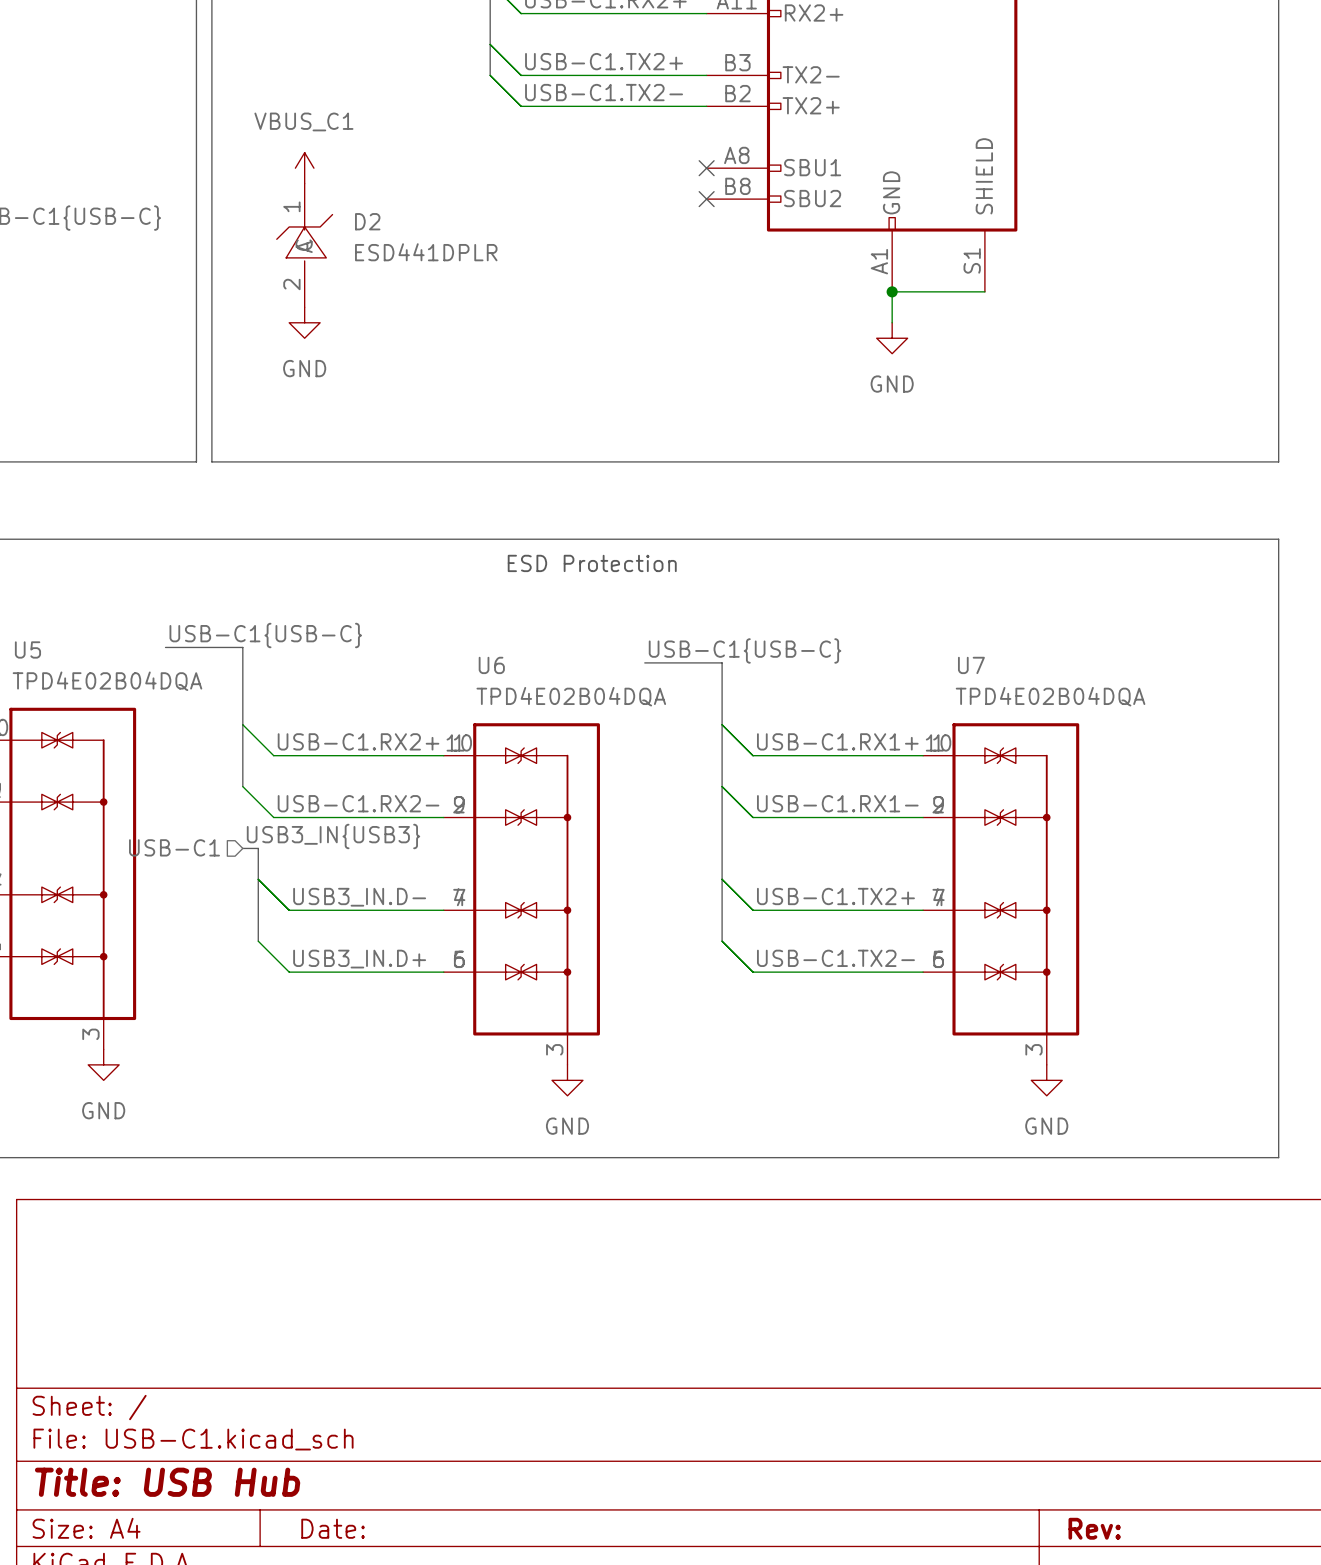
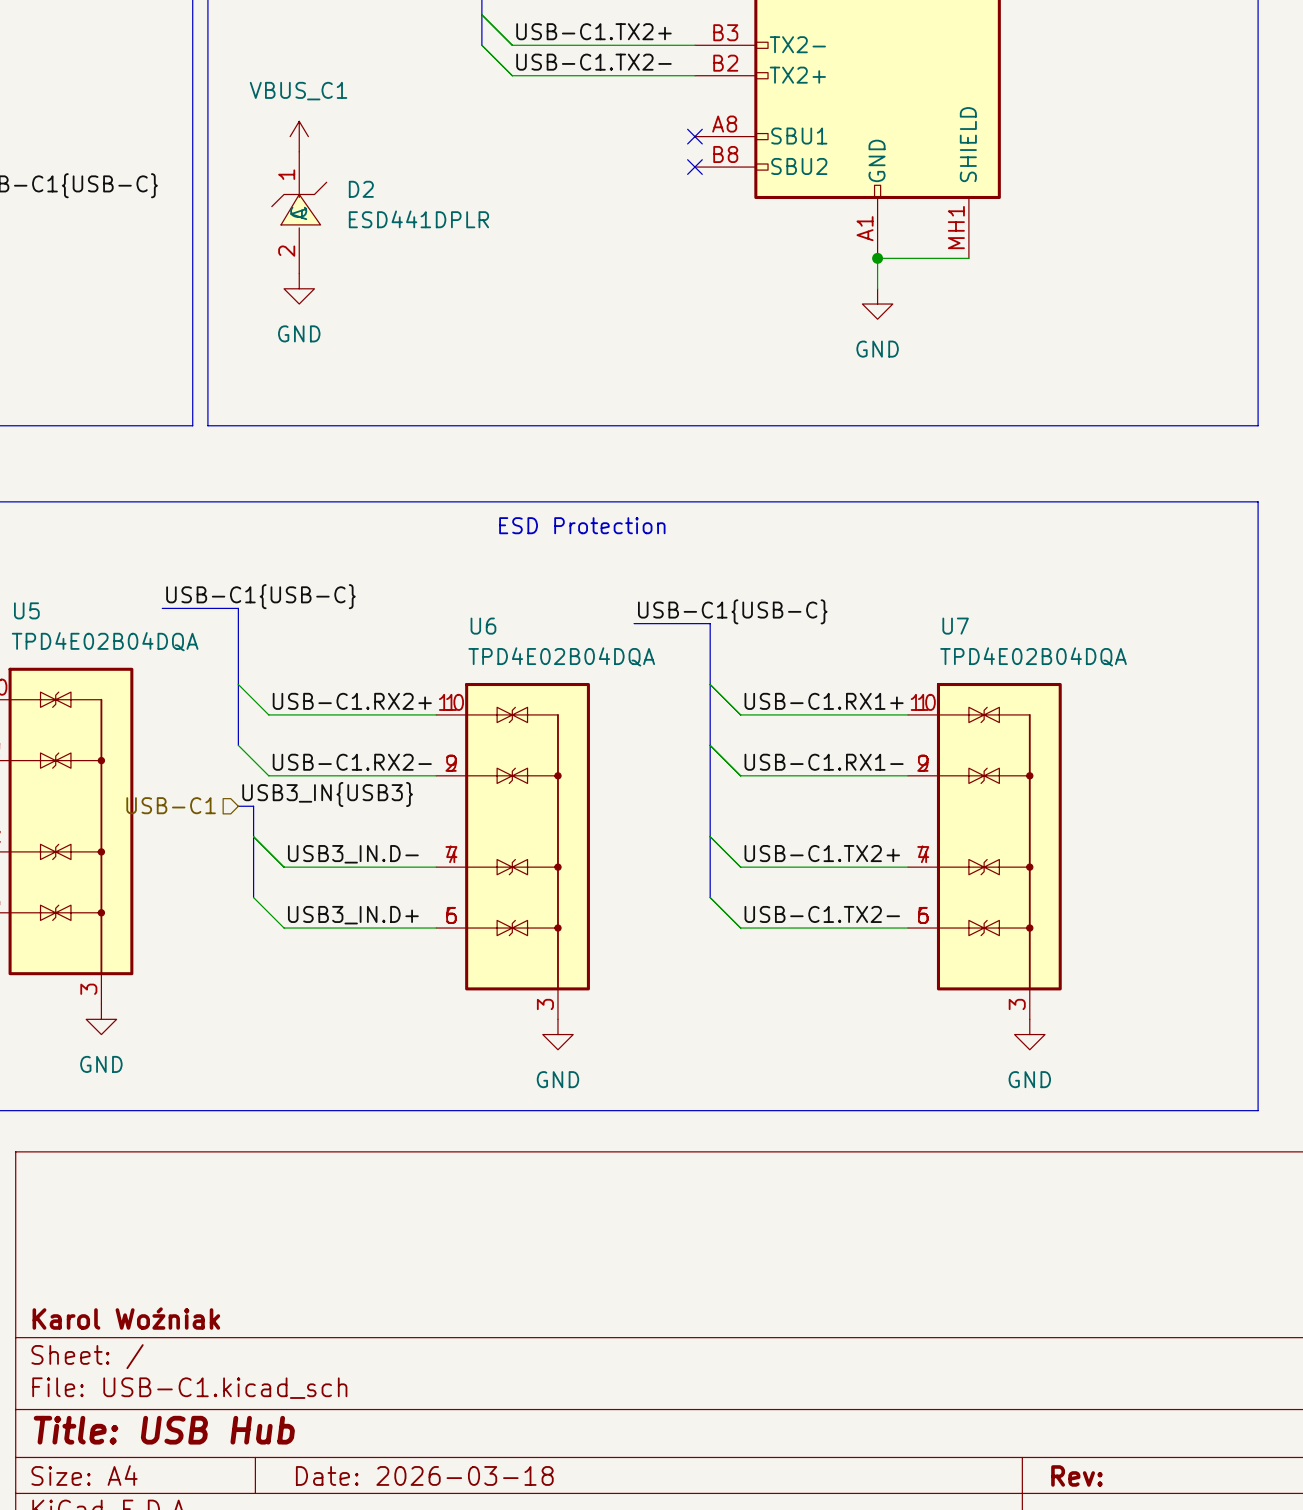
part pin number: S1 (972, 260) -> MH1 (956, 227)
title block: none -> Karol Woźniak (126, 1318)
title block: Date: (333, 1528) -> Date: 2026-03-18 (424, 1475)

